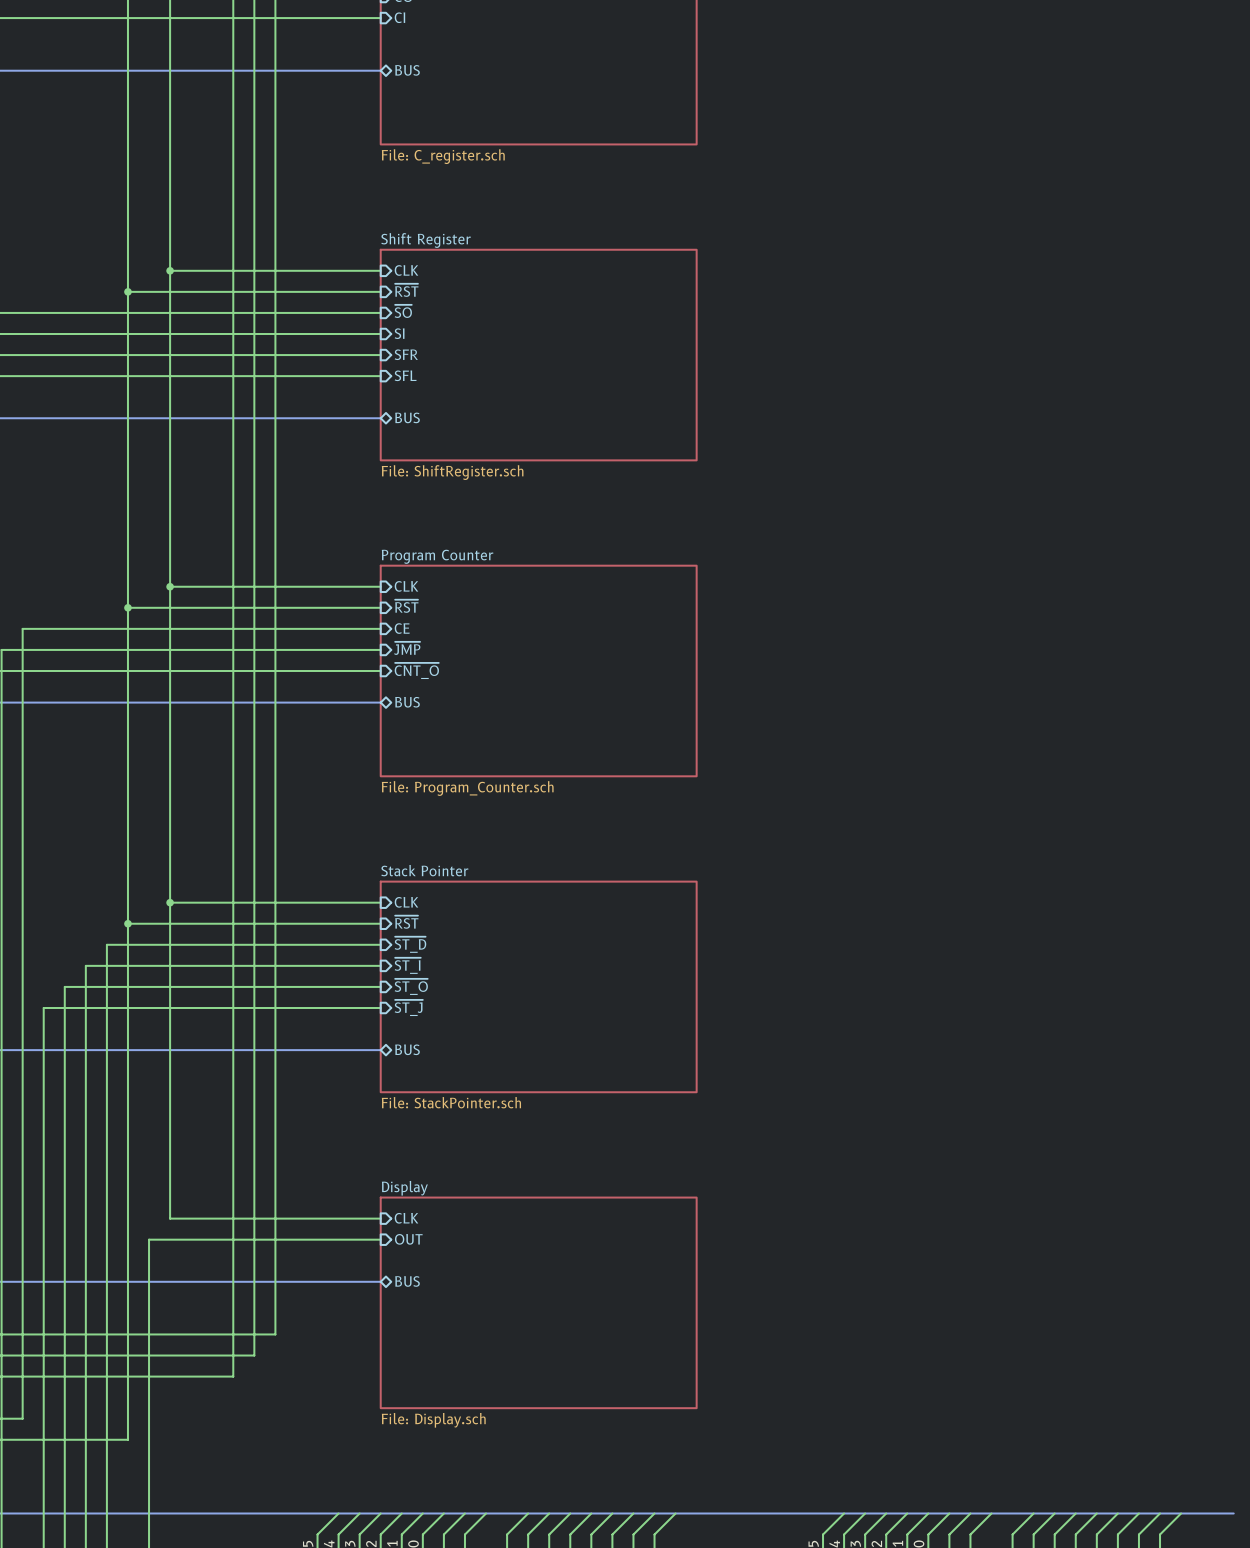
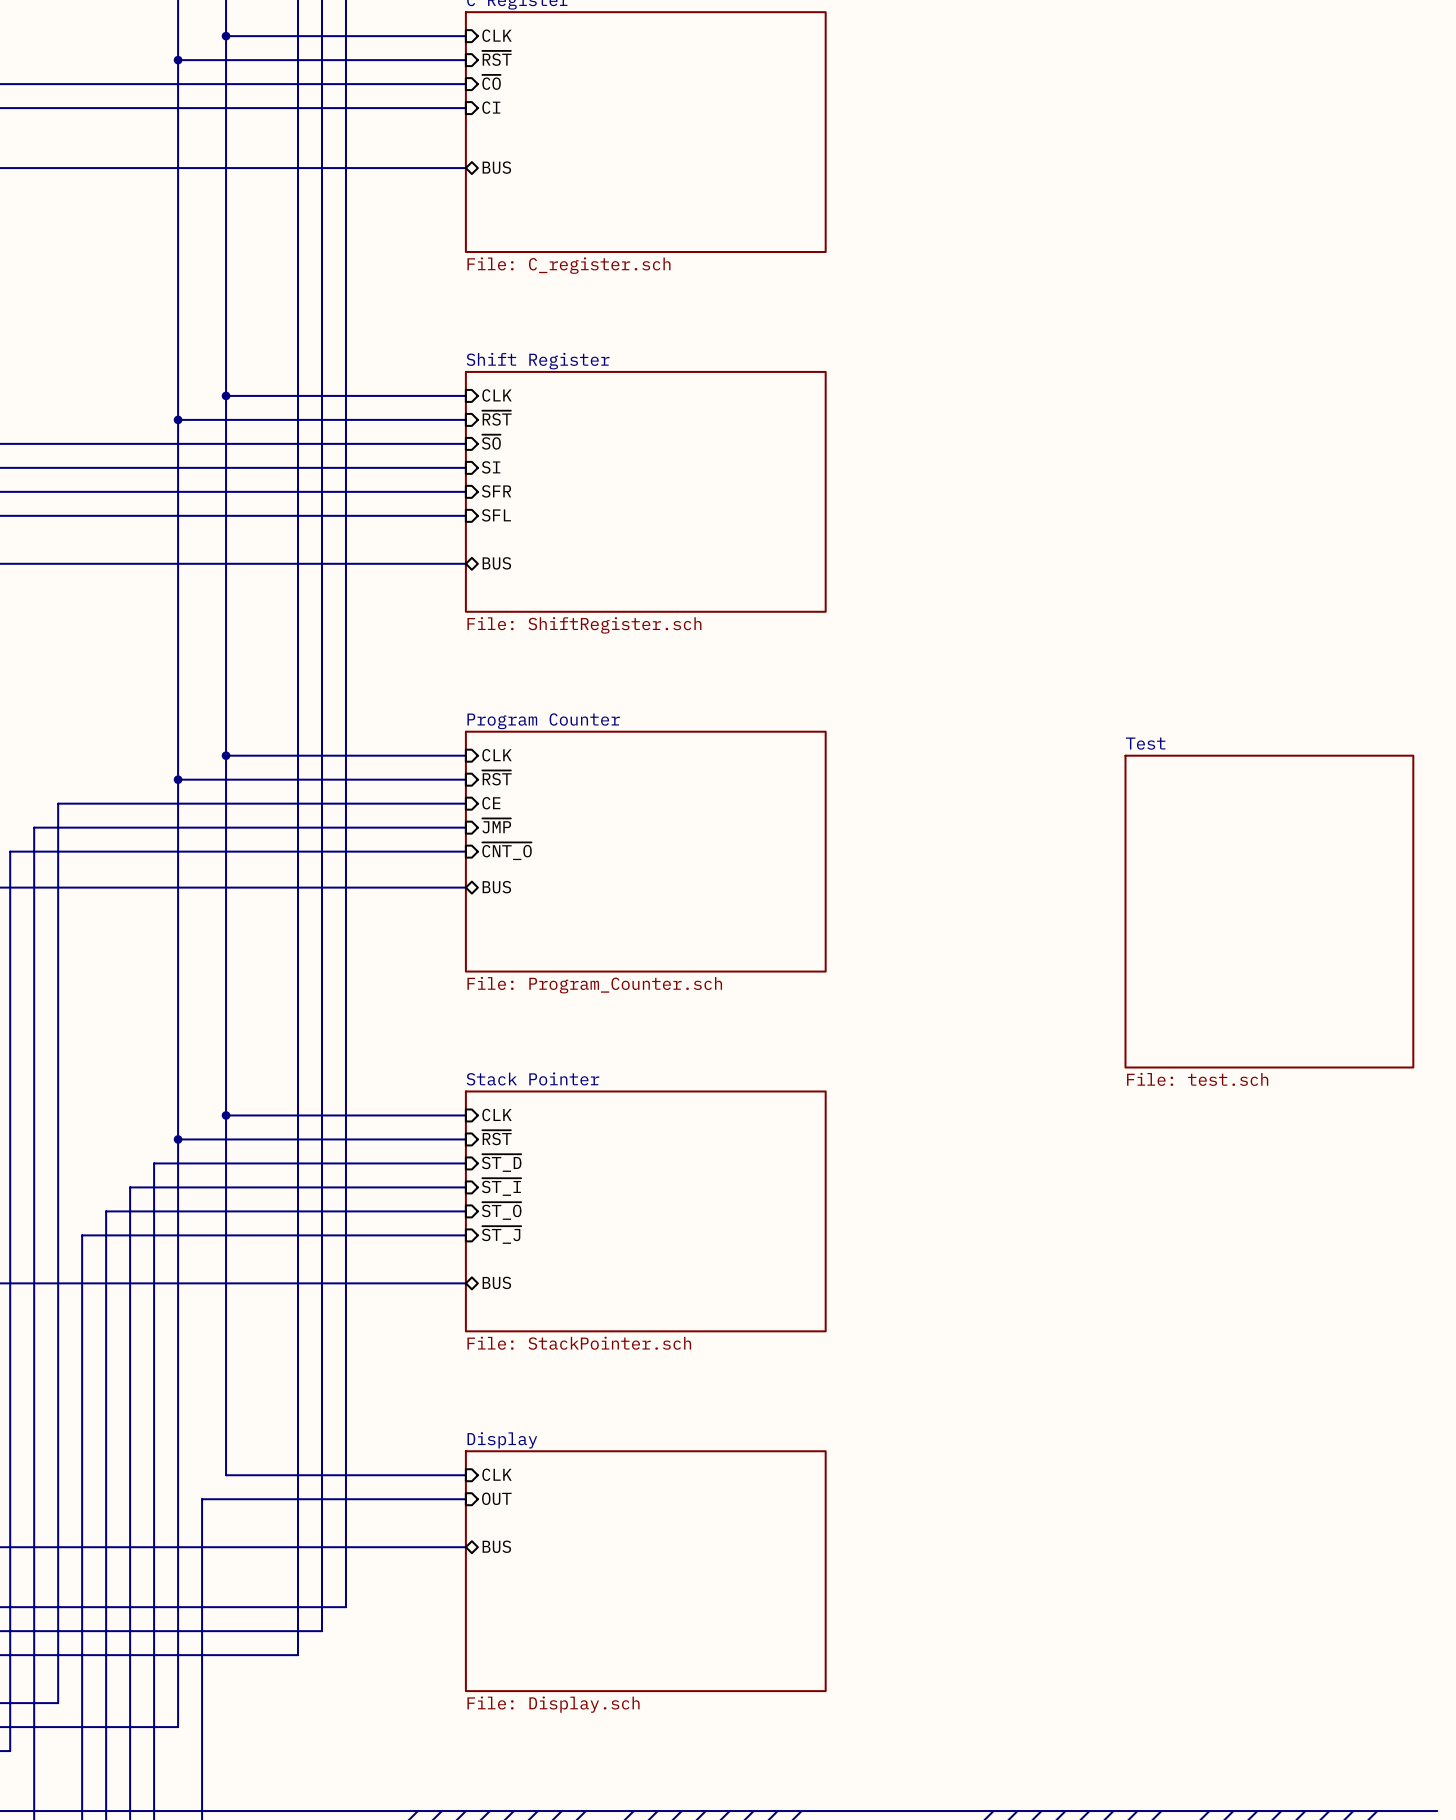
sheet Test: none -> File: test.sch (1269, 911)

